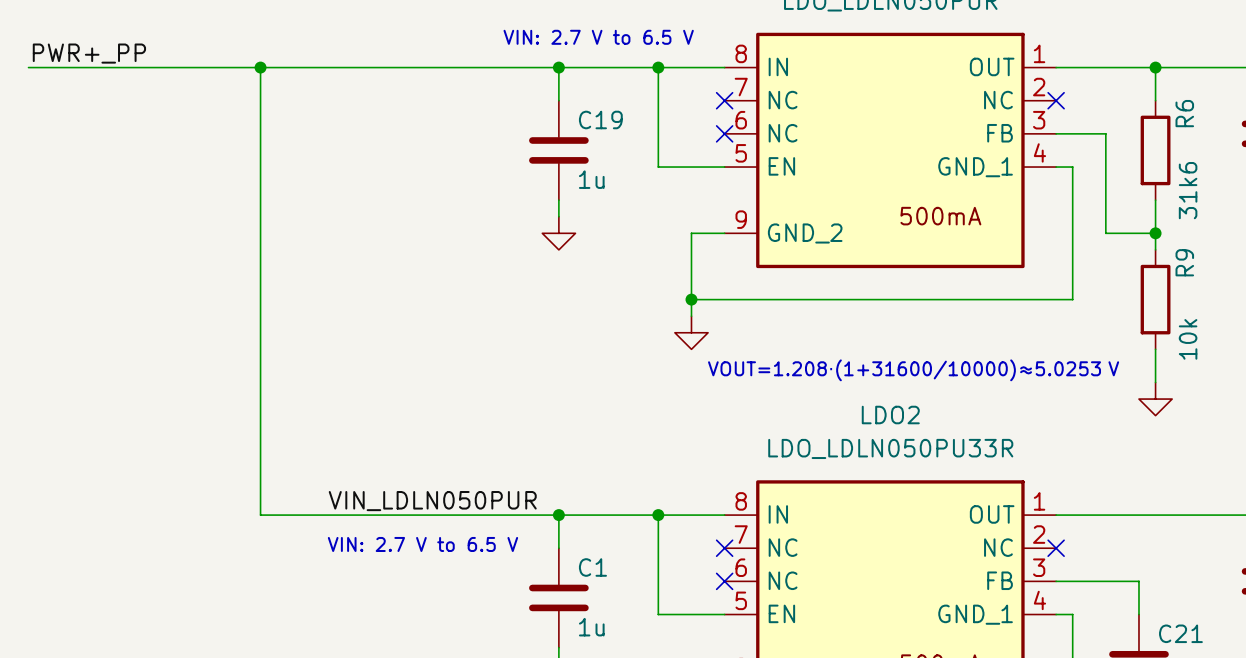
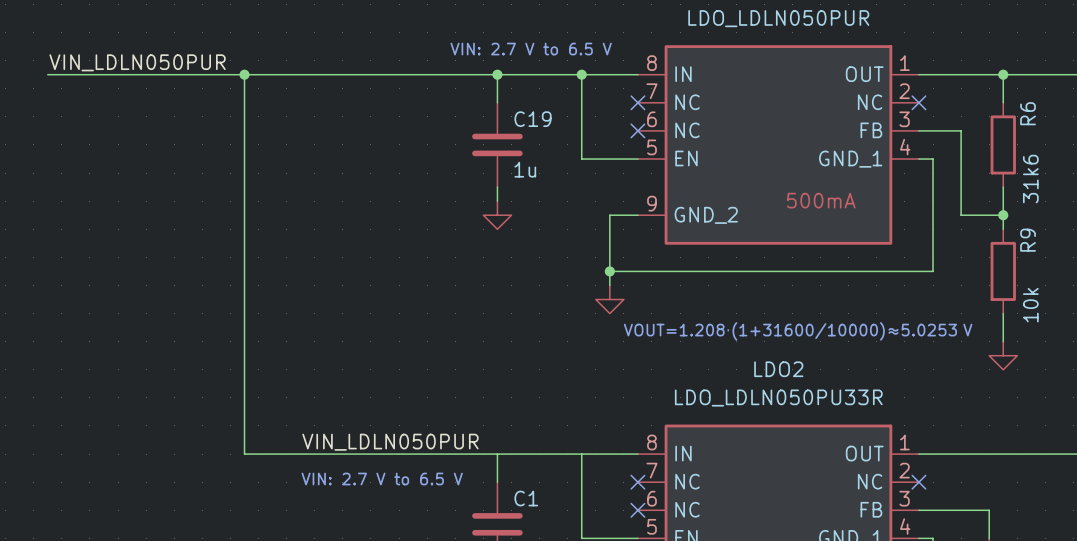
label: PWR+_PP (89, 53) -> VIN_LDLN050PUR (137, 62)
junction: (558, 515) -> none
junction: (658, 515) -> none

